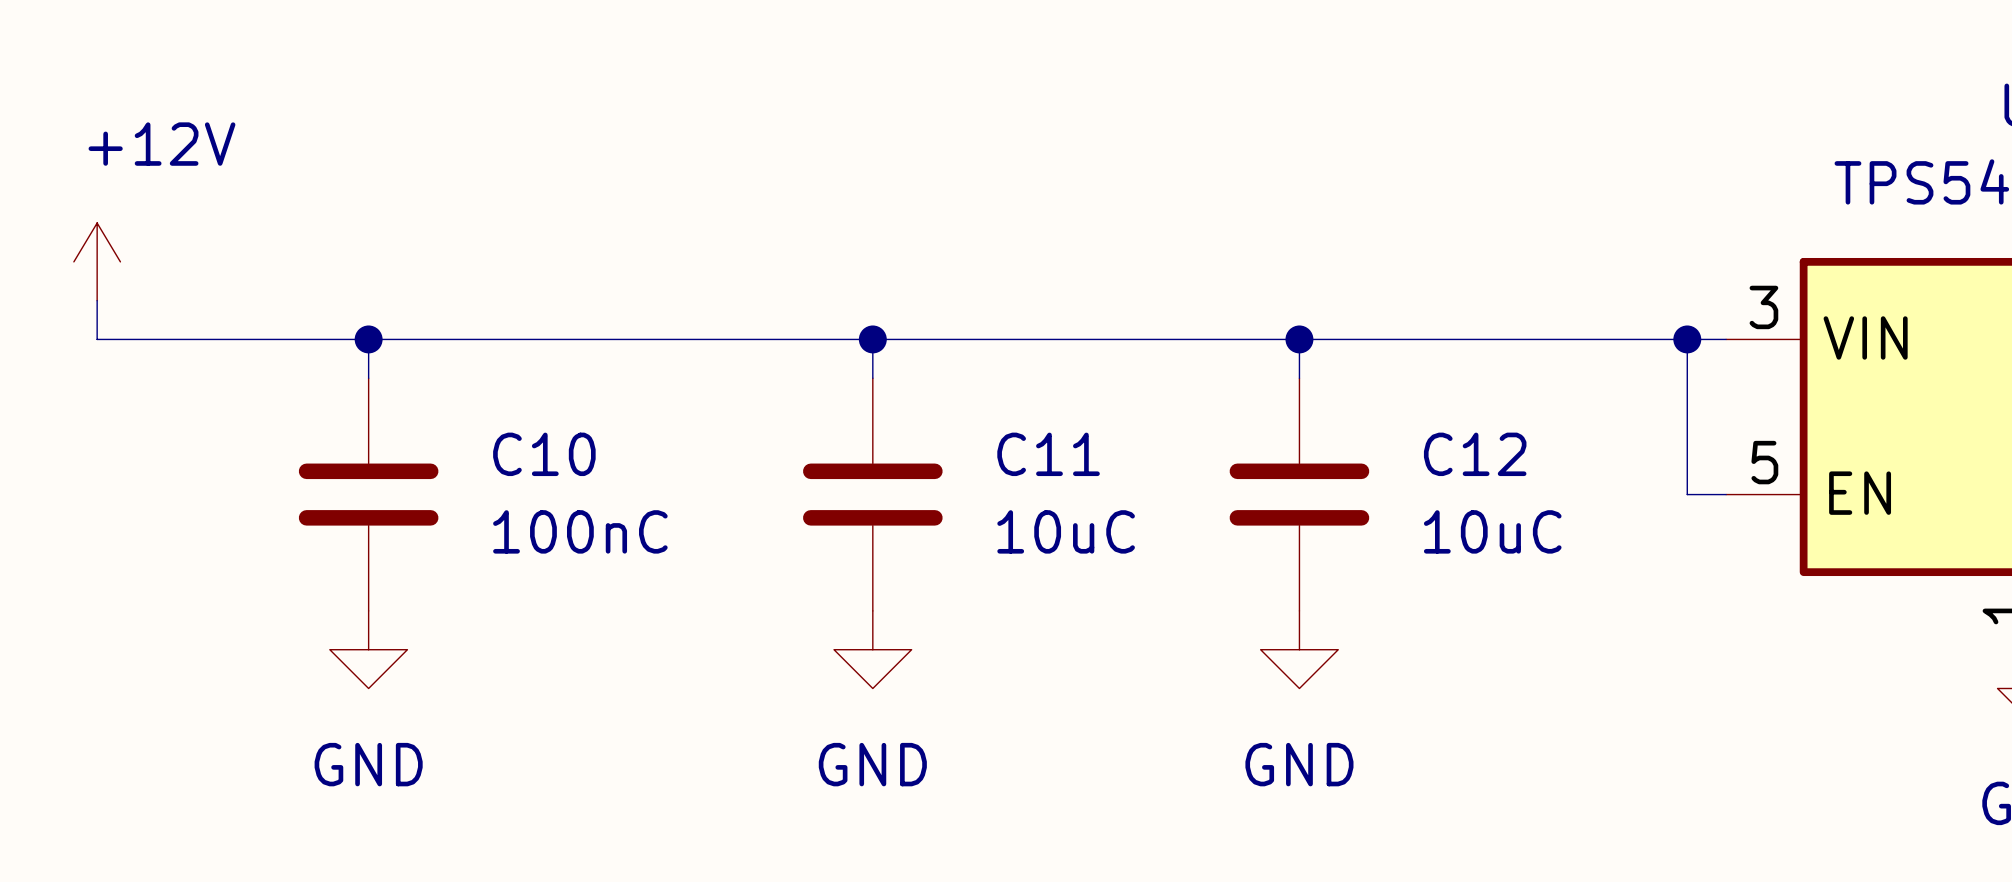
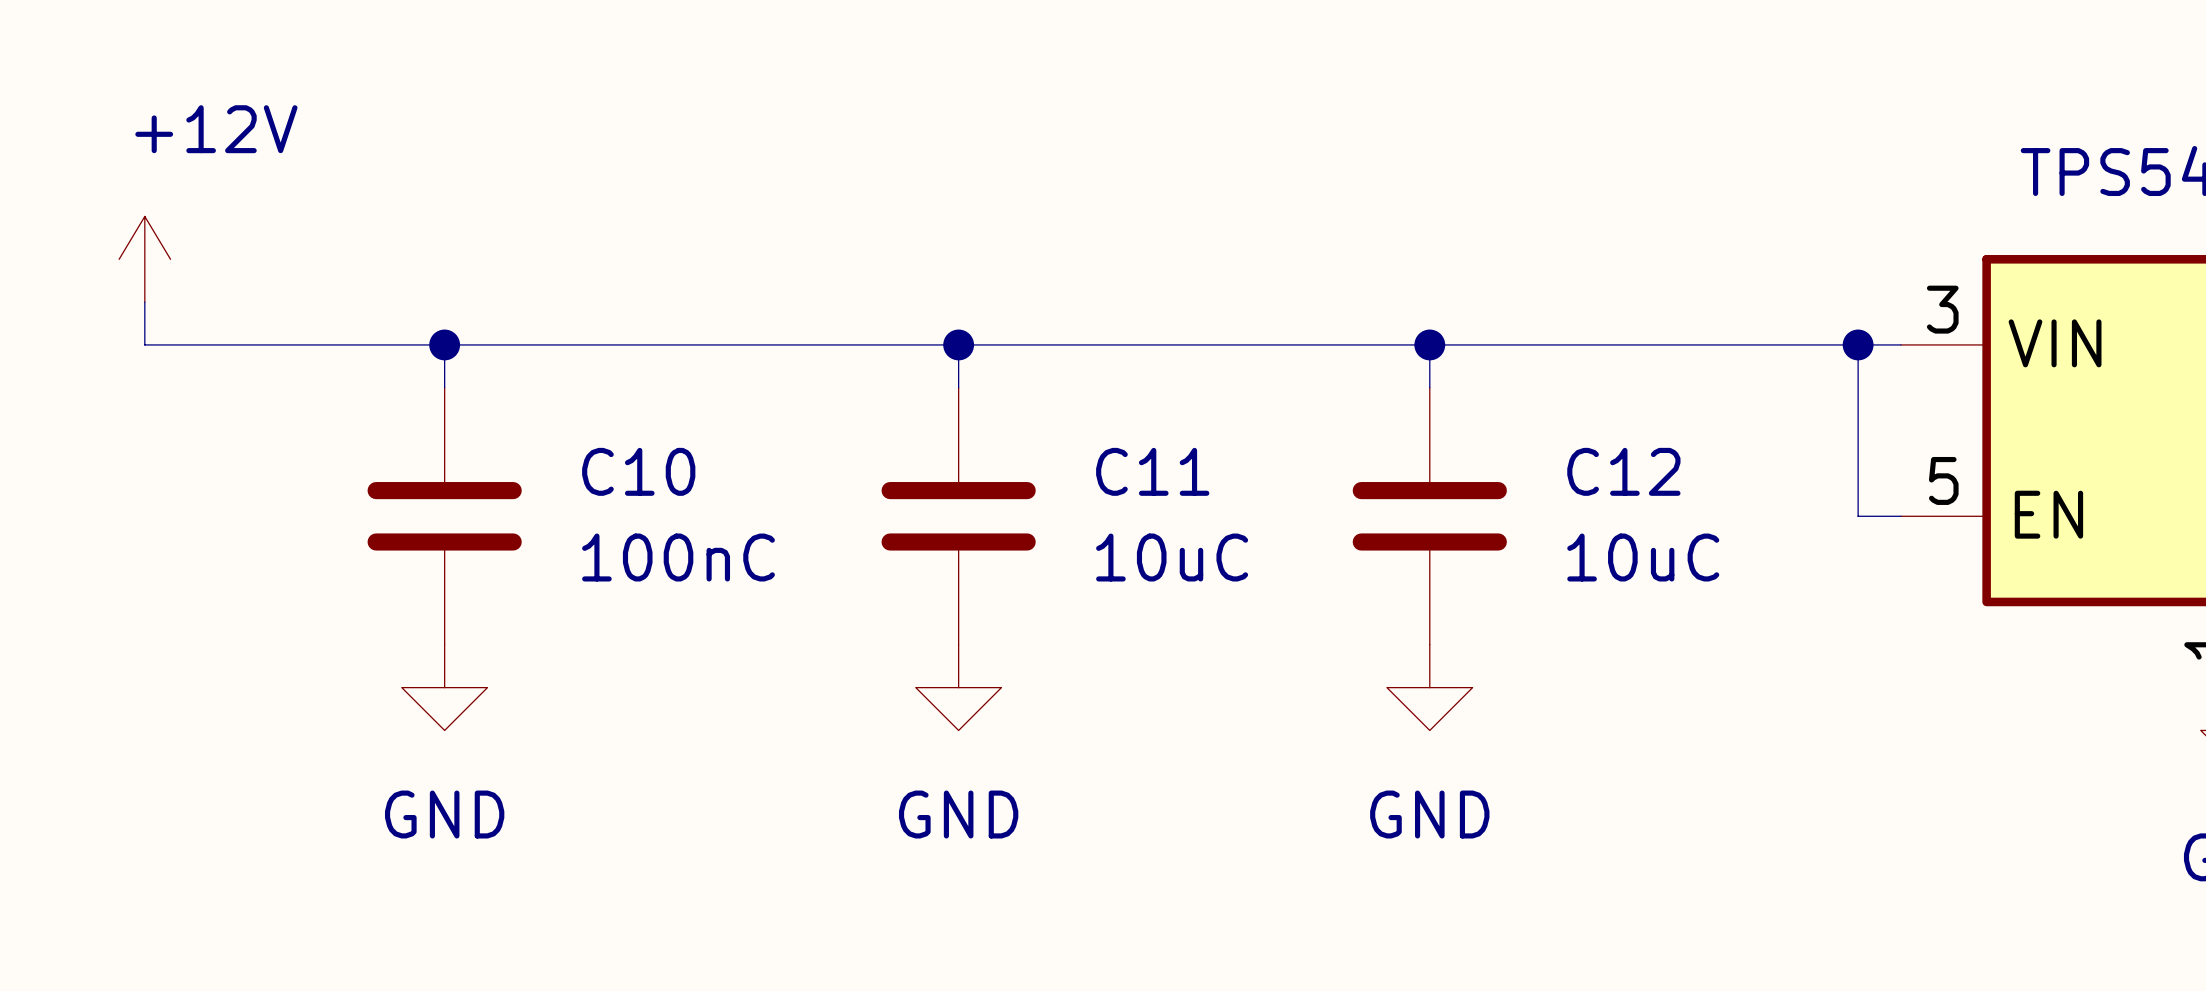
power symbol position: +12V (97, 261) -> +12V (144, 259)
wire: (97, 300) (97, 339) (135, 339) -> (144, 302) (144, 344)
wire: (368, 339) (368, 378) -> (444, 344) (444, 387)
junction position: (368, 339) -> (444, 344)
C10 position: (368, 494) -> (444, 516)
power symbol position: GND (368, 649) -> GND (444, 687)

